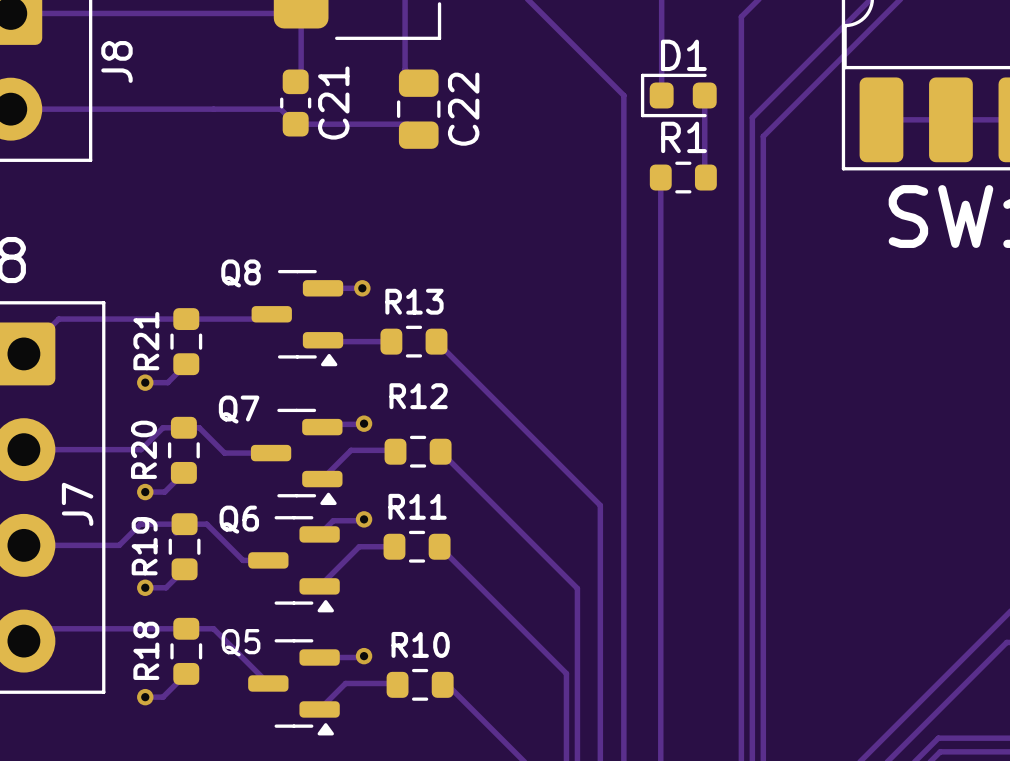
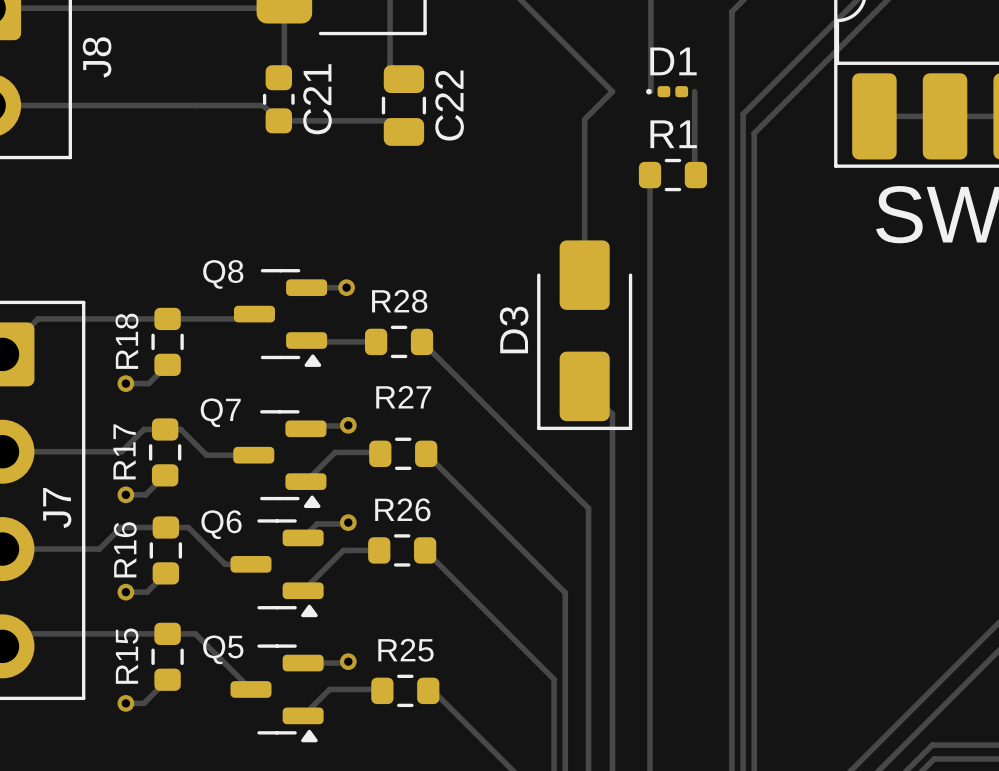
D1 footprint: [640, 73, 717, 118] -> [646, 86, 689, 98]
track: (623, 95) (623, 412) -> (612, 91) (584, 119) (584, 275)
R13 name: R13 (414, 301) -> R28 (399, 301)
D3: none -> (584, 335)
R21 name: R21 (146, 341) -> R18 (126, 341)
R12 name: R12 (418, 396) -> R27 (403, 397)
R20 name: R20 (143, 449) -> R17 (124, 451)
R11 name: R11 (417, 506) -> R26 (402, 509)
R19 name: R19 (144, 546) -> R16 (125, 549)
R10 name: R10 (420, 644) -> R25 (405, 650)
R18 name: R18 (146, 650) -> R15 (127, 656)

